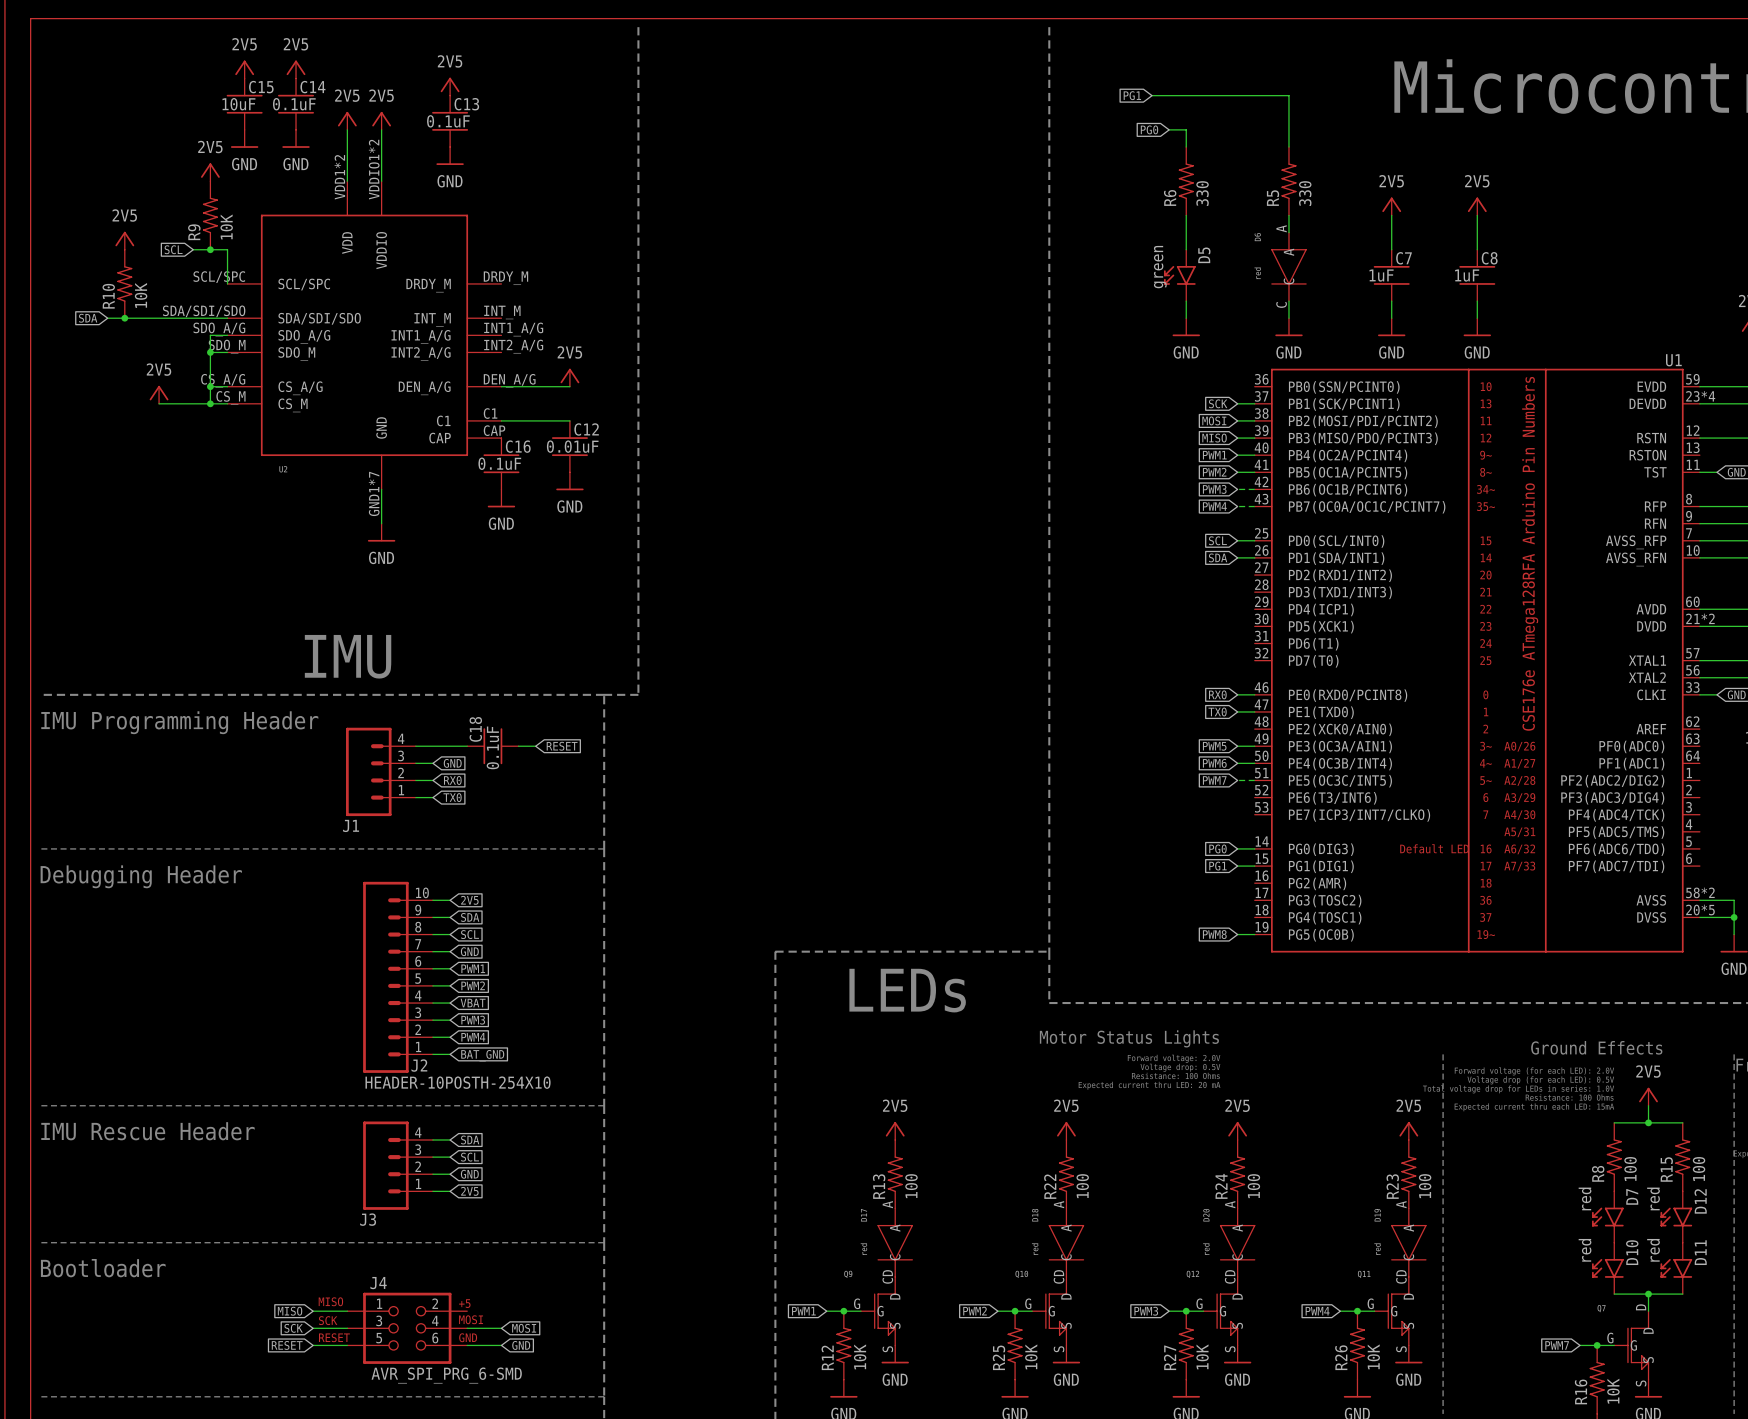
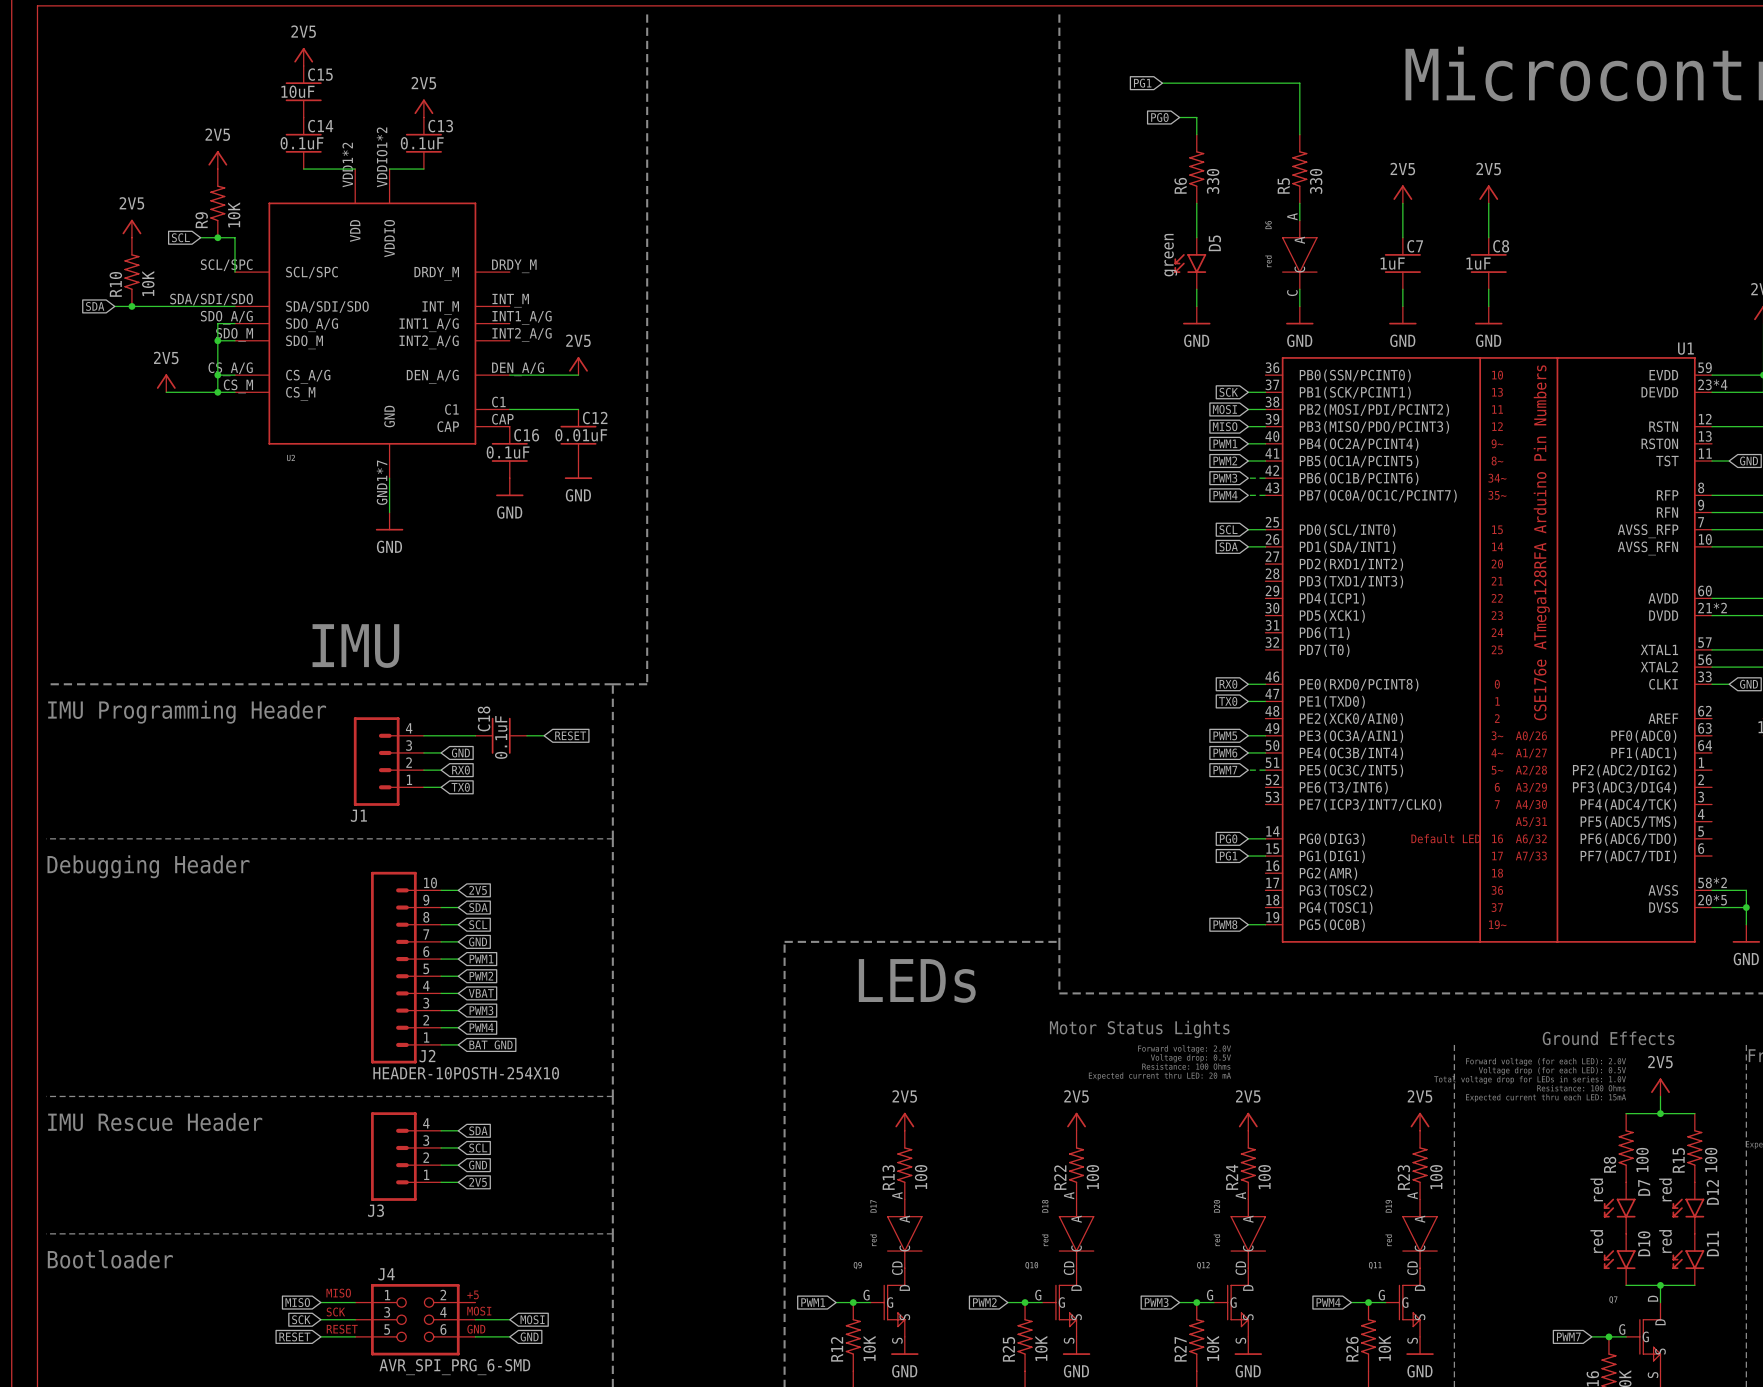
power symbol: 2V5 (244, 69) -> none
power symbol: 2V5 (450, 86) -> none
C14 name: C14 (312, 87) -> C15 (320, 74)
C15: 10uF (244, 104) -> none
C14 value: 0.1uF (294, 104) -> 10uF (297, 91)
power symbol: 2V5 (347, 120) -> none
power symbol: 2V5 (381, 120) -> none
power symbol: none -> 2V5 (423, 108)
C13 position: (450, 121) -> (423, 143)
wire: (347, 129) (347, 181) -> (303, 169) (355, 169)
wire: (381, 129) (381, 181) -> (423, 169) (389, 169)
power symbol: GND (244, 138) -> none
power symbol: GND (296, 138) -> none
C14: none -> 0.1uF (303, 143)
power symbol: GND (450, 156) -> none

